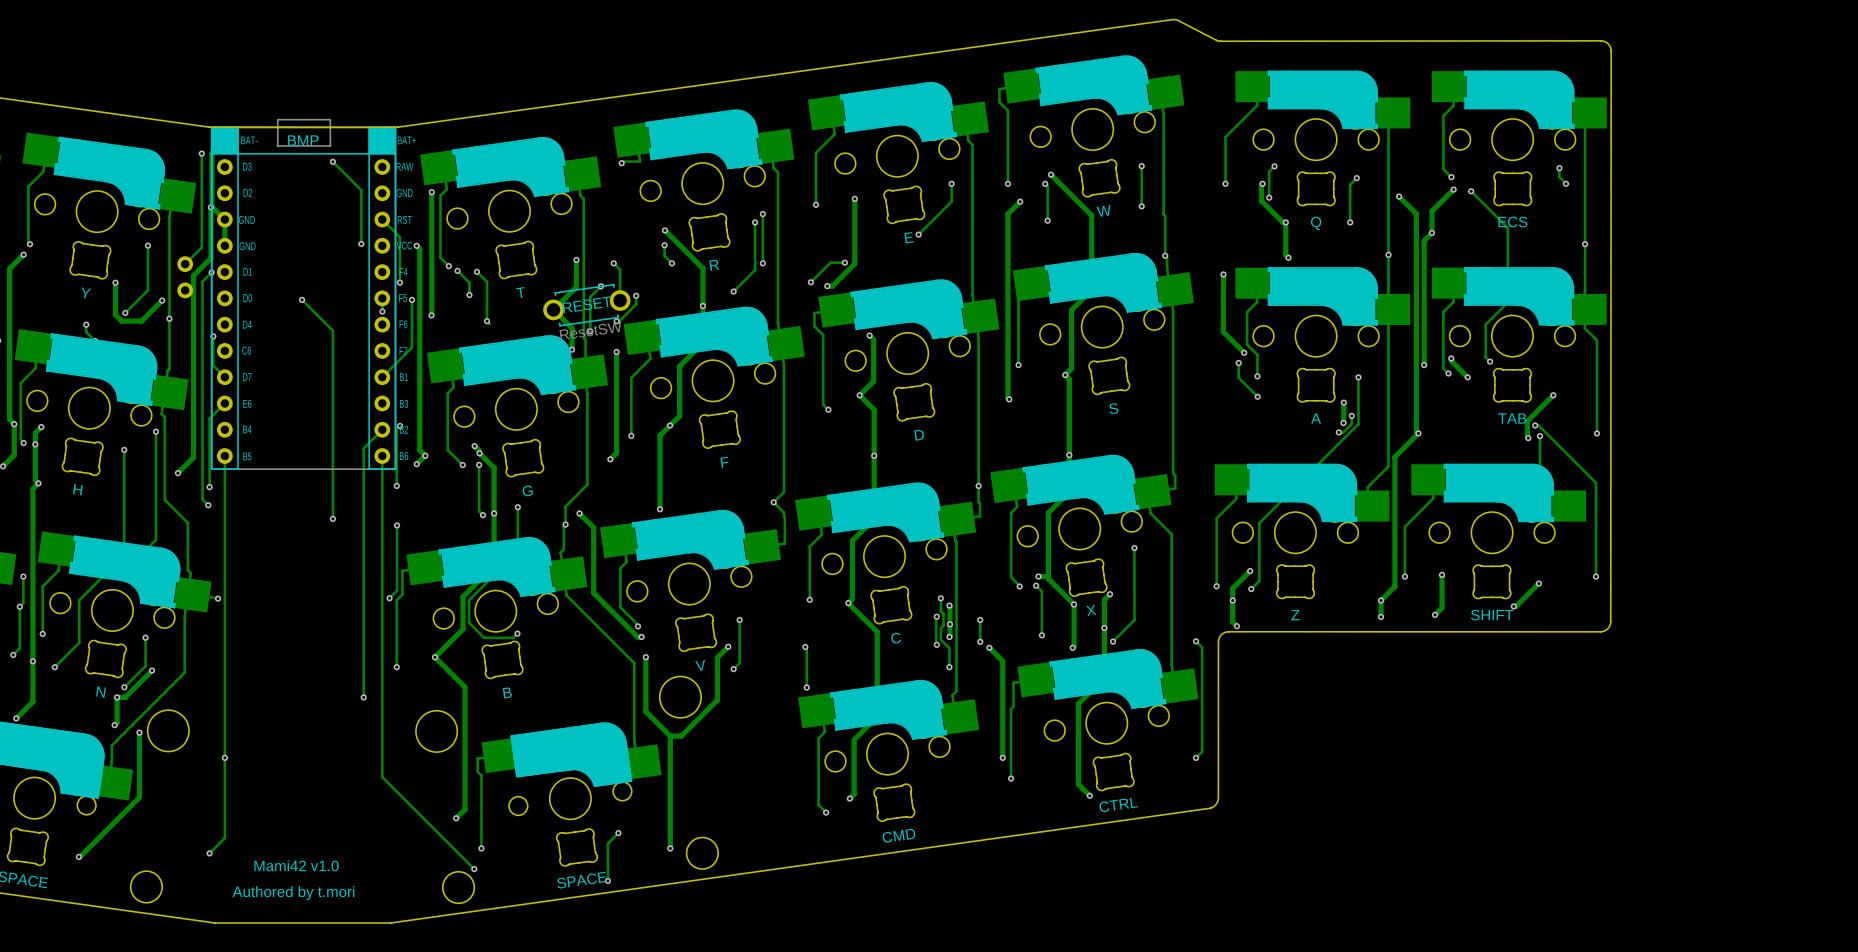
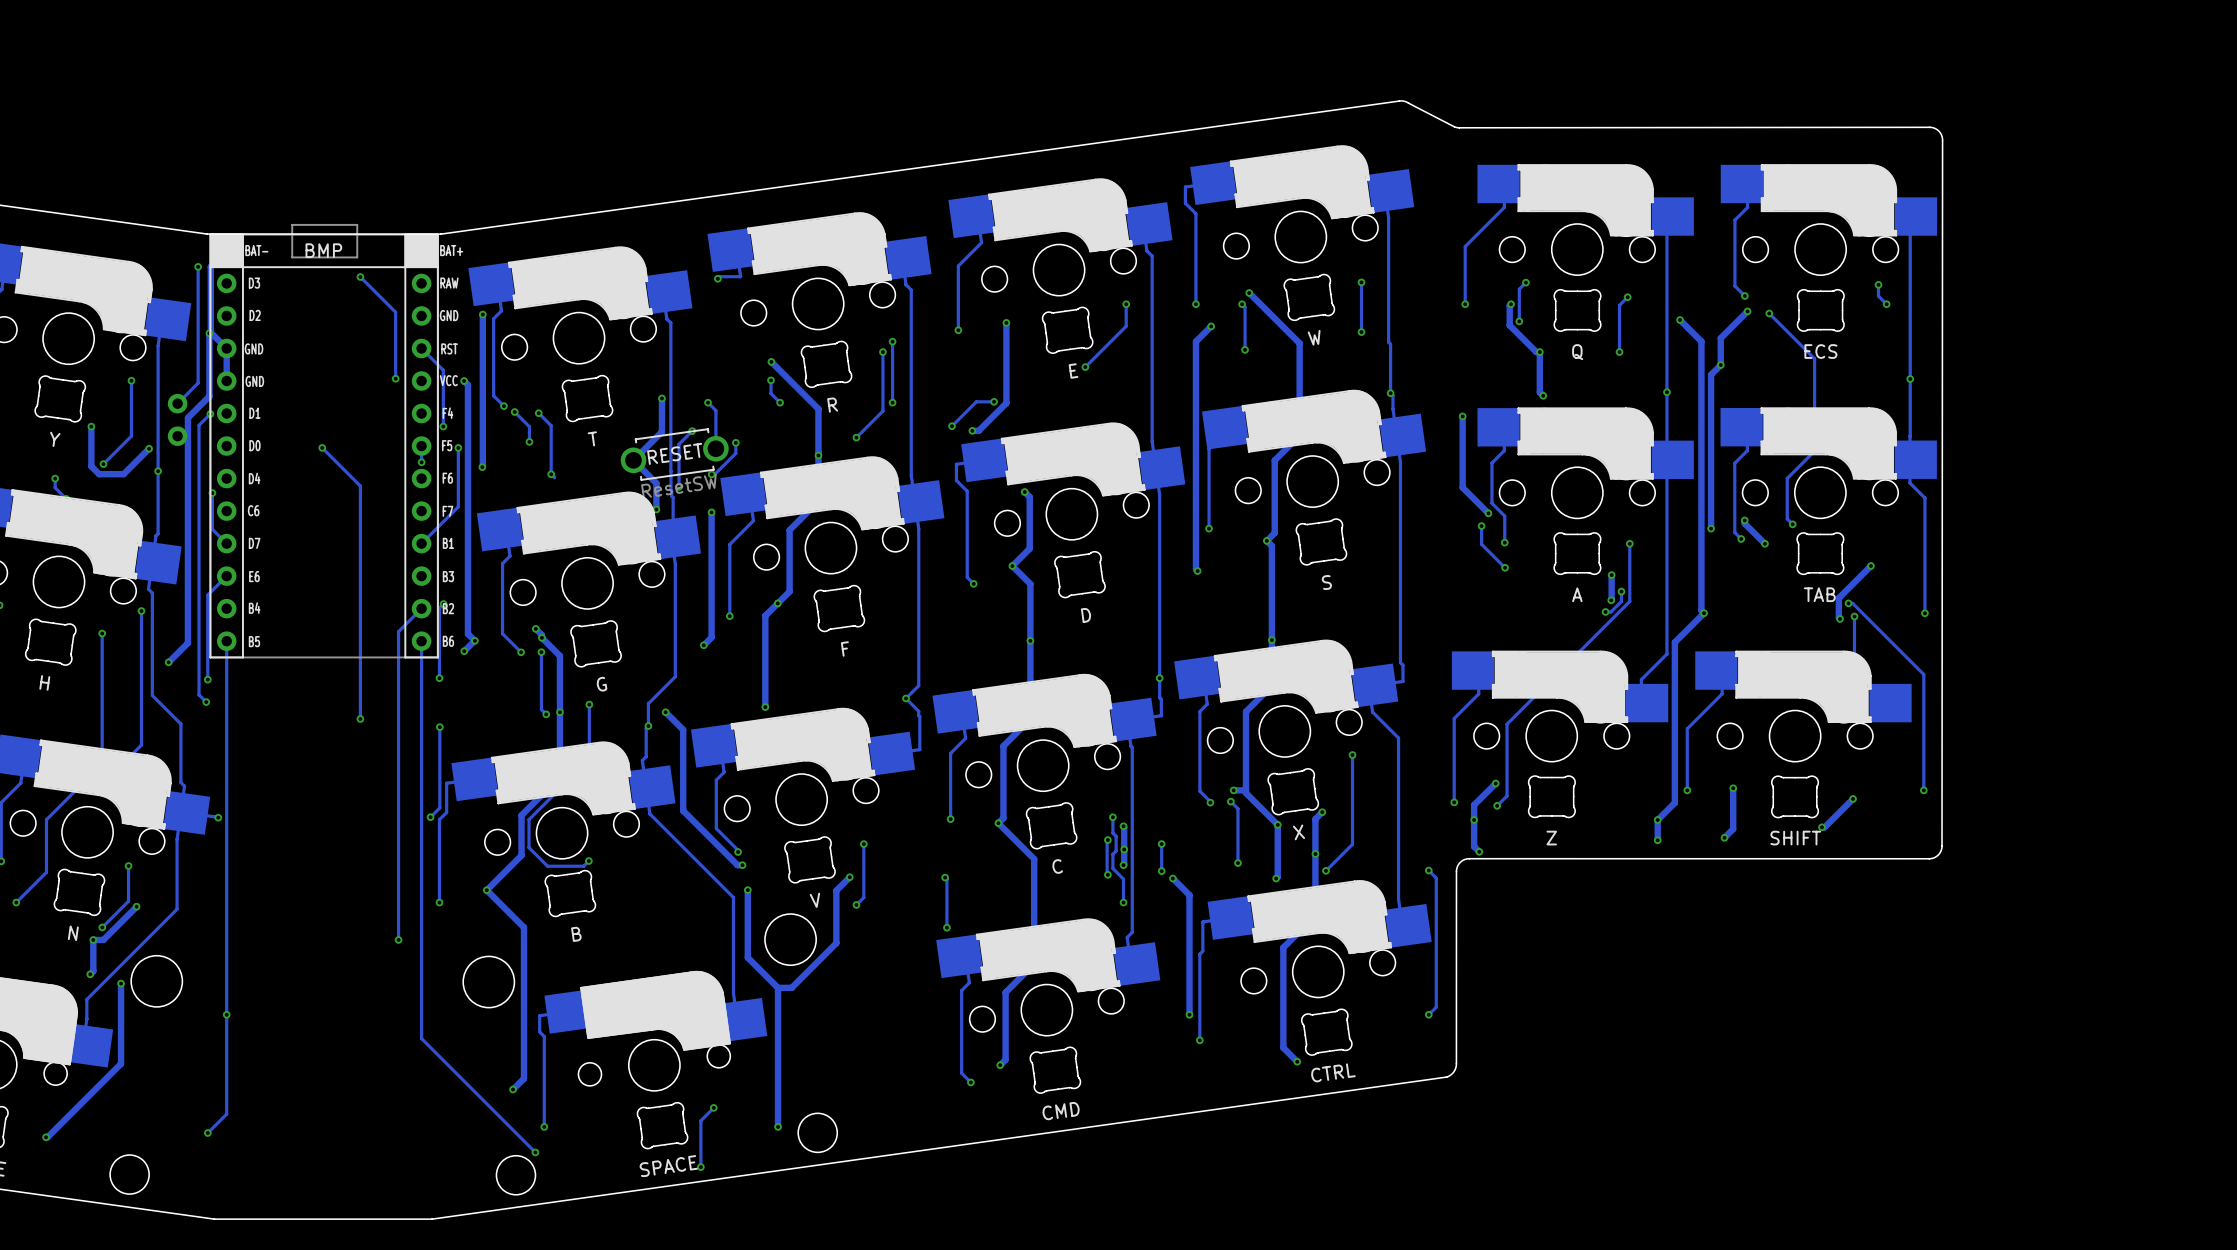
text: Mami42 v1.0 (296, 865) -> none
text: Authored by t.mori (293, 893) -> none

